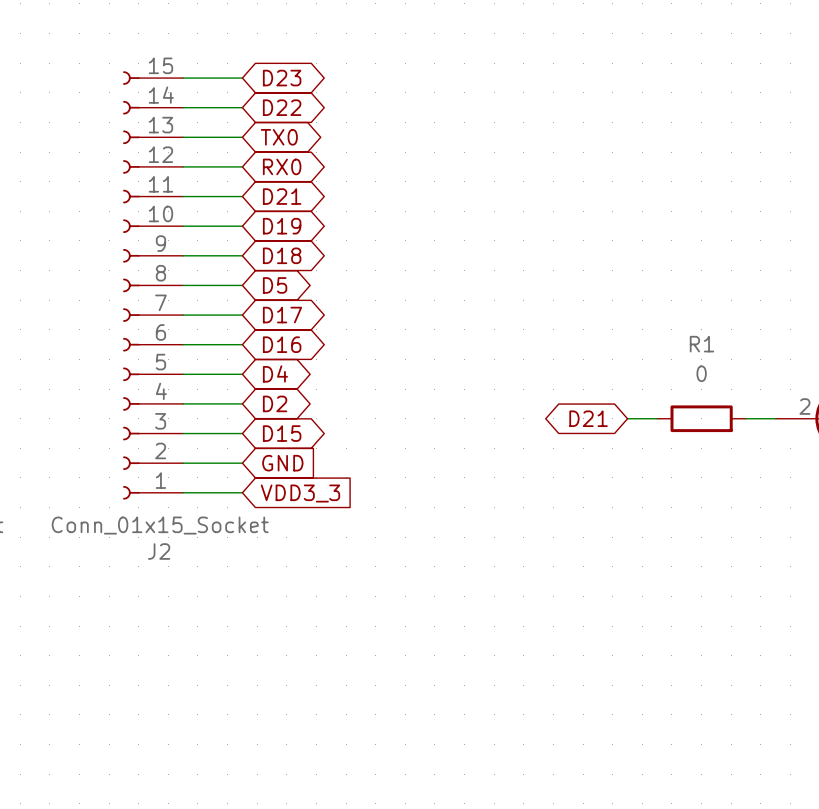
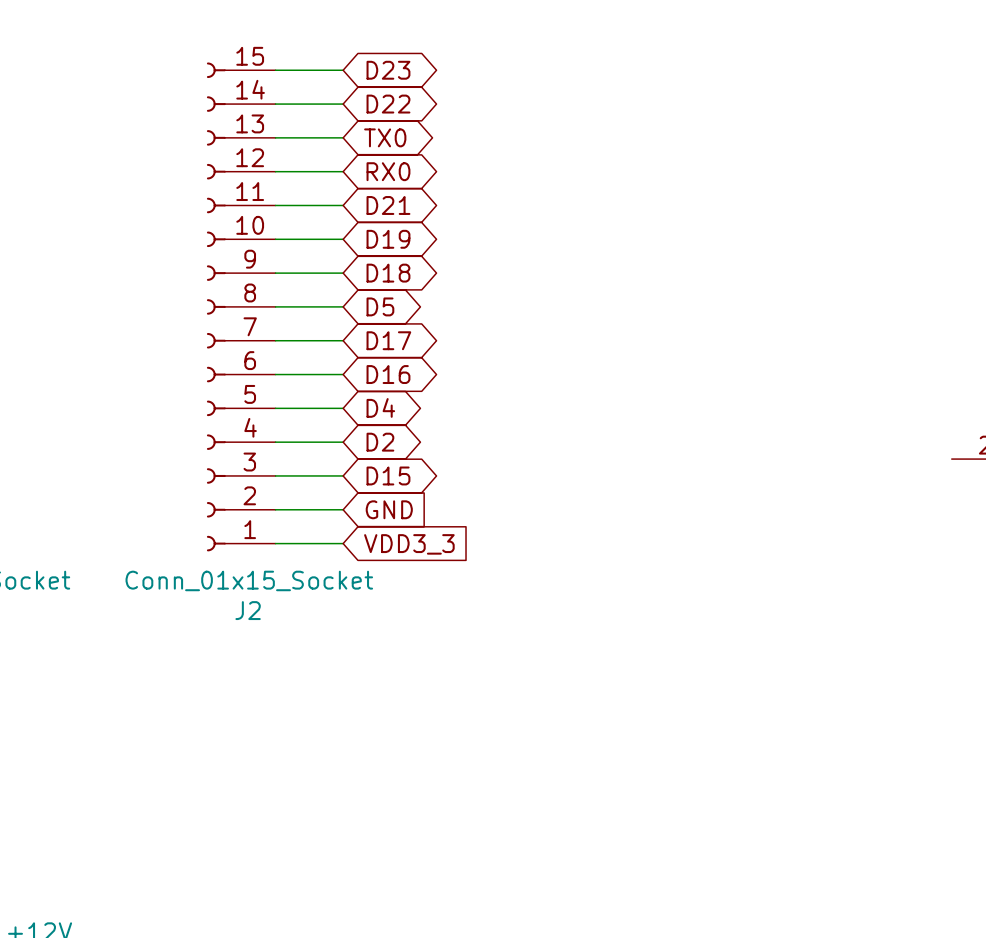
global label: D21 (588, 418) -> none
wire: (627, 418) (657, 418) -> none
R1: 0 (701, 418) -> none
wire: (746, 418) (775, 418) -> none

